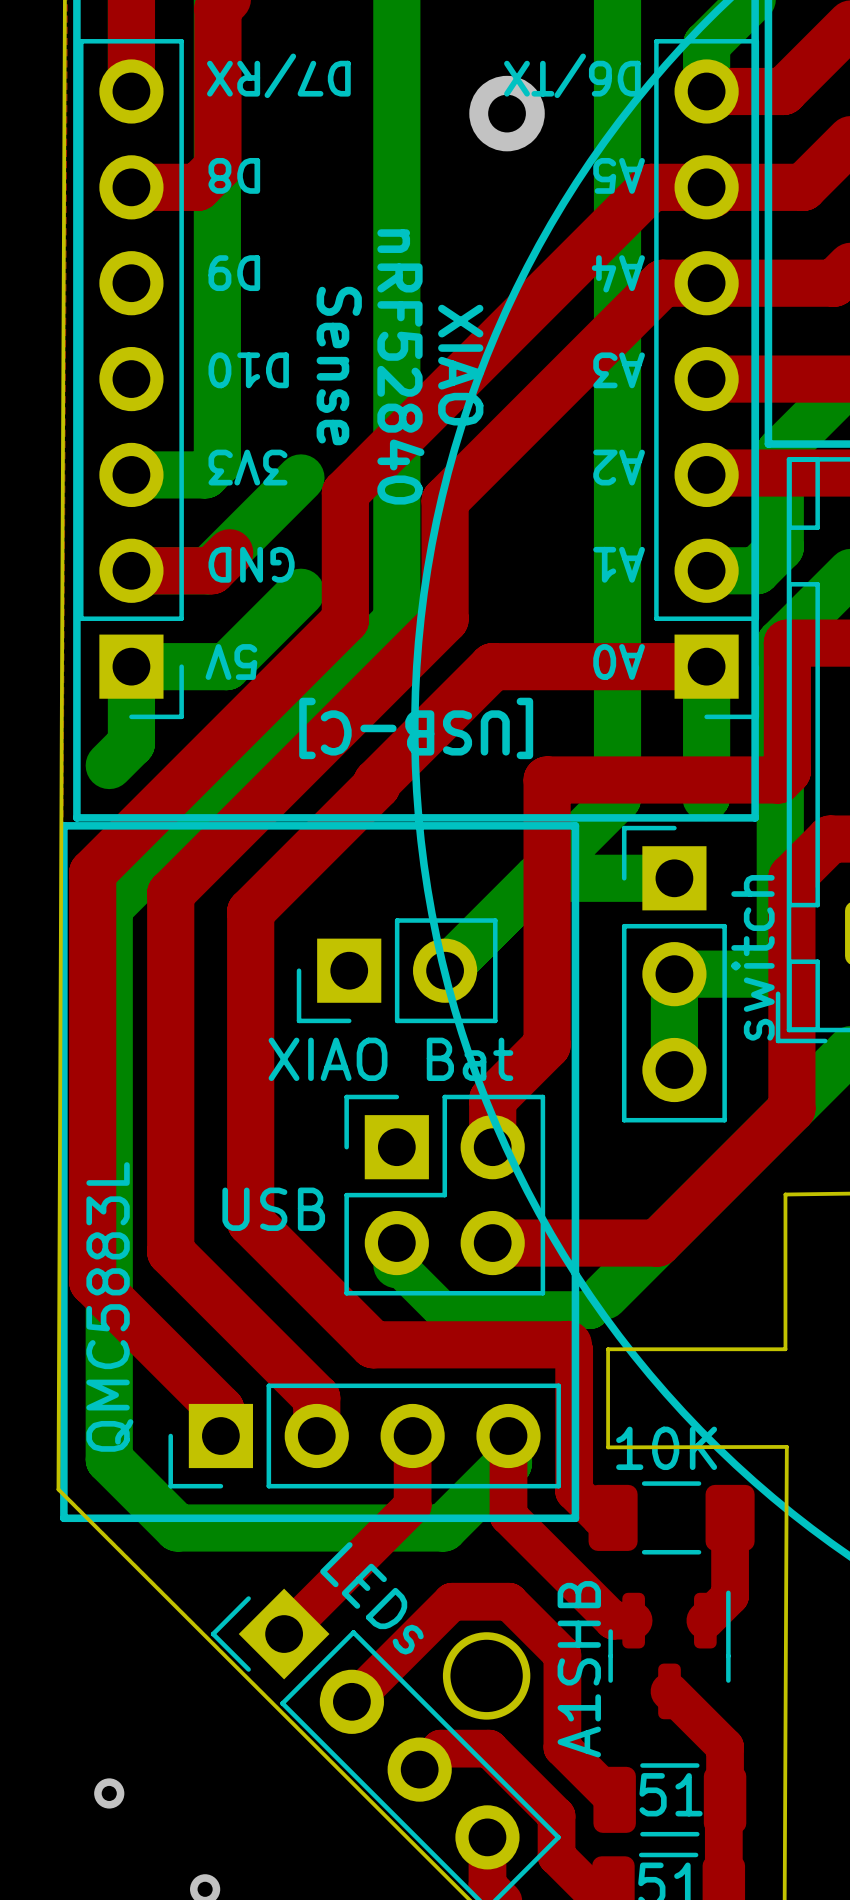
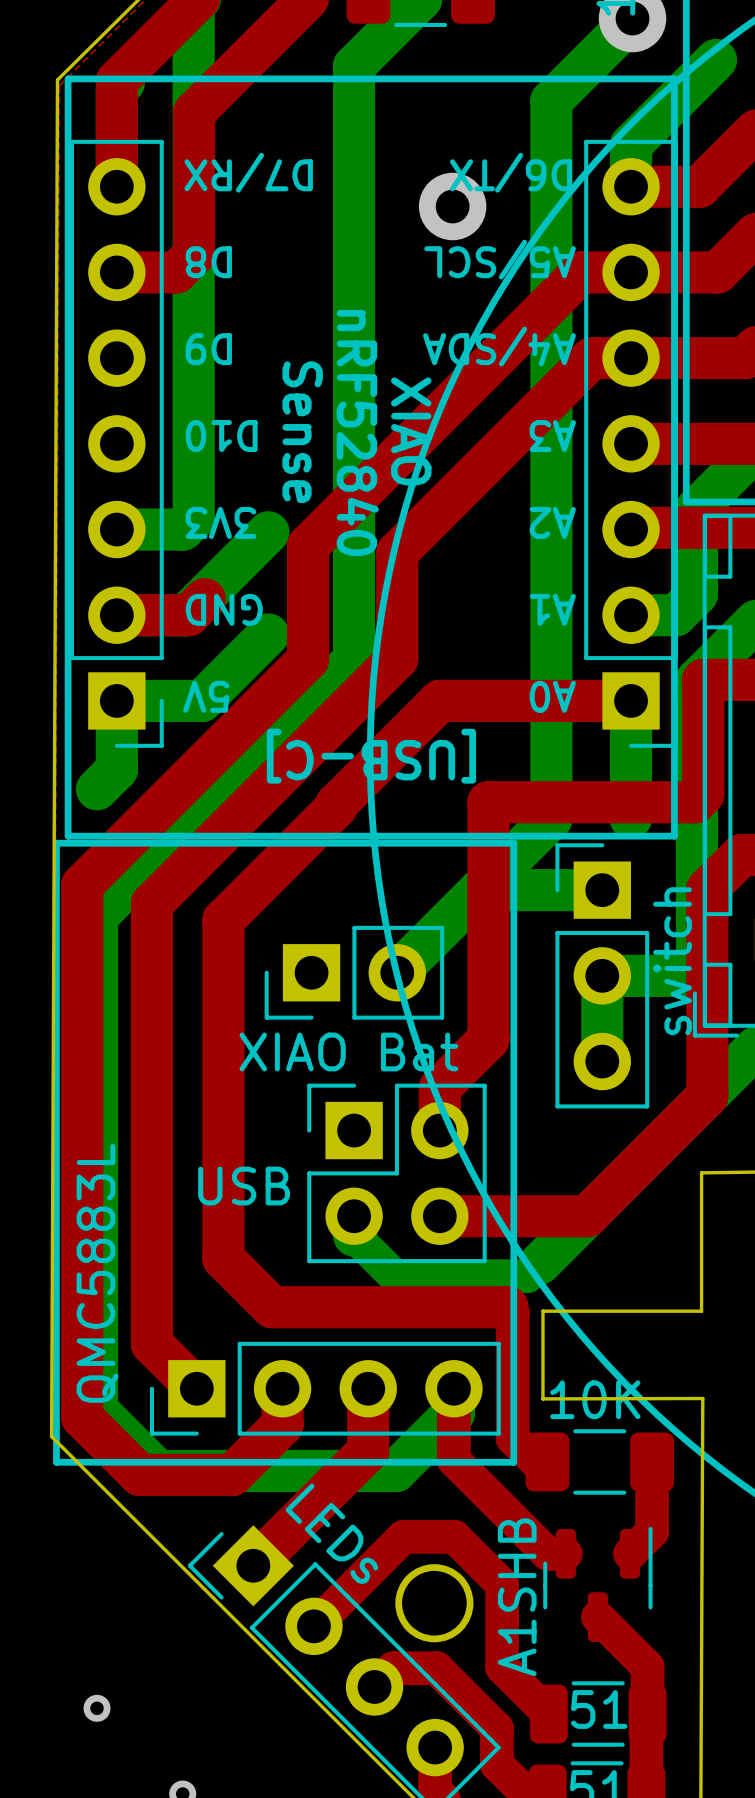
text: A5 (619, 175) -> A5/SCL (500, 259)
text: A4 (618, 273) -> A4/SDA (499, 346)
top track: (250, 1222) (373, 1344) -> (223, 1197) (223, 1258) (272, 1307) (333, 1307)
top track: (170, 1252) (316, 1398) (316, 1435) -> (82, 1250) (82, 1417) (139, 1474) (232, 1474) (282, 1424) (282, 1388)
top track: (92, 1281) (220, 1409) (220, 1435) -> (151, 1224) (151, 1343) (196, 1388)
top track width: thin (412, 1435) (412, 1505) (284, 1634) -> thick (368, 1388) (368, 1450) (253, 1565)

